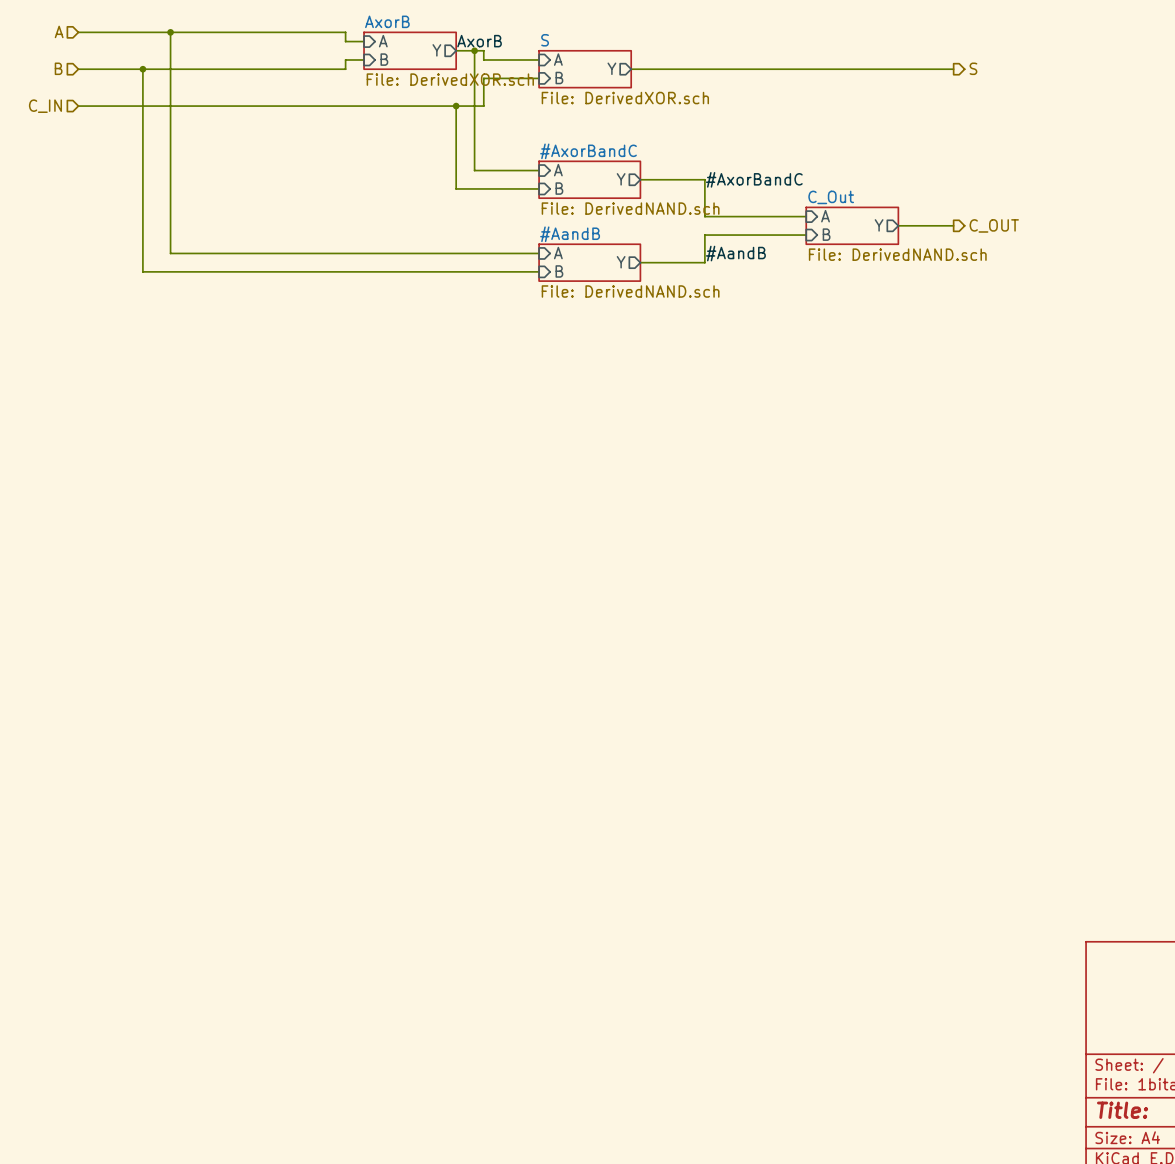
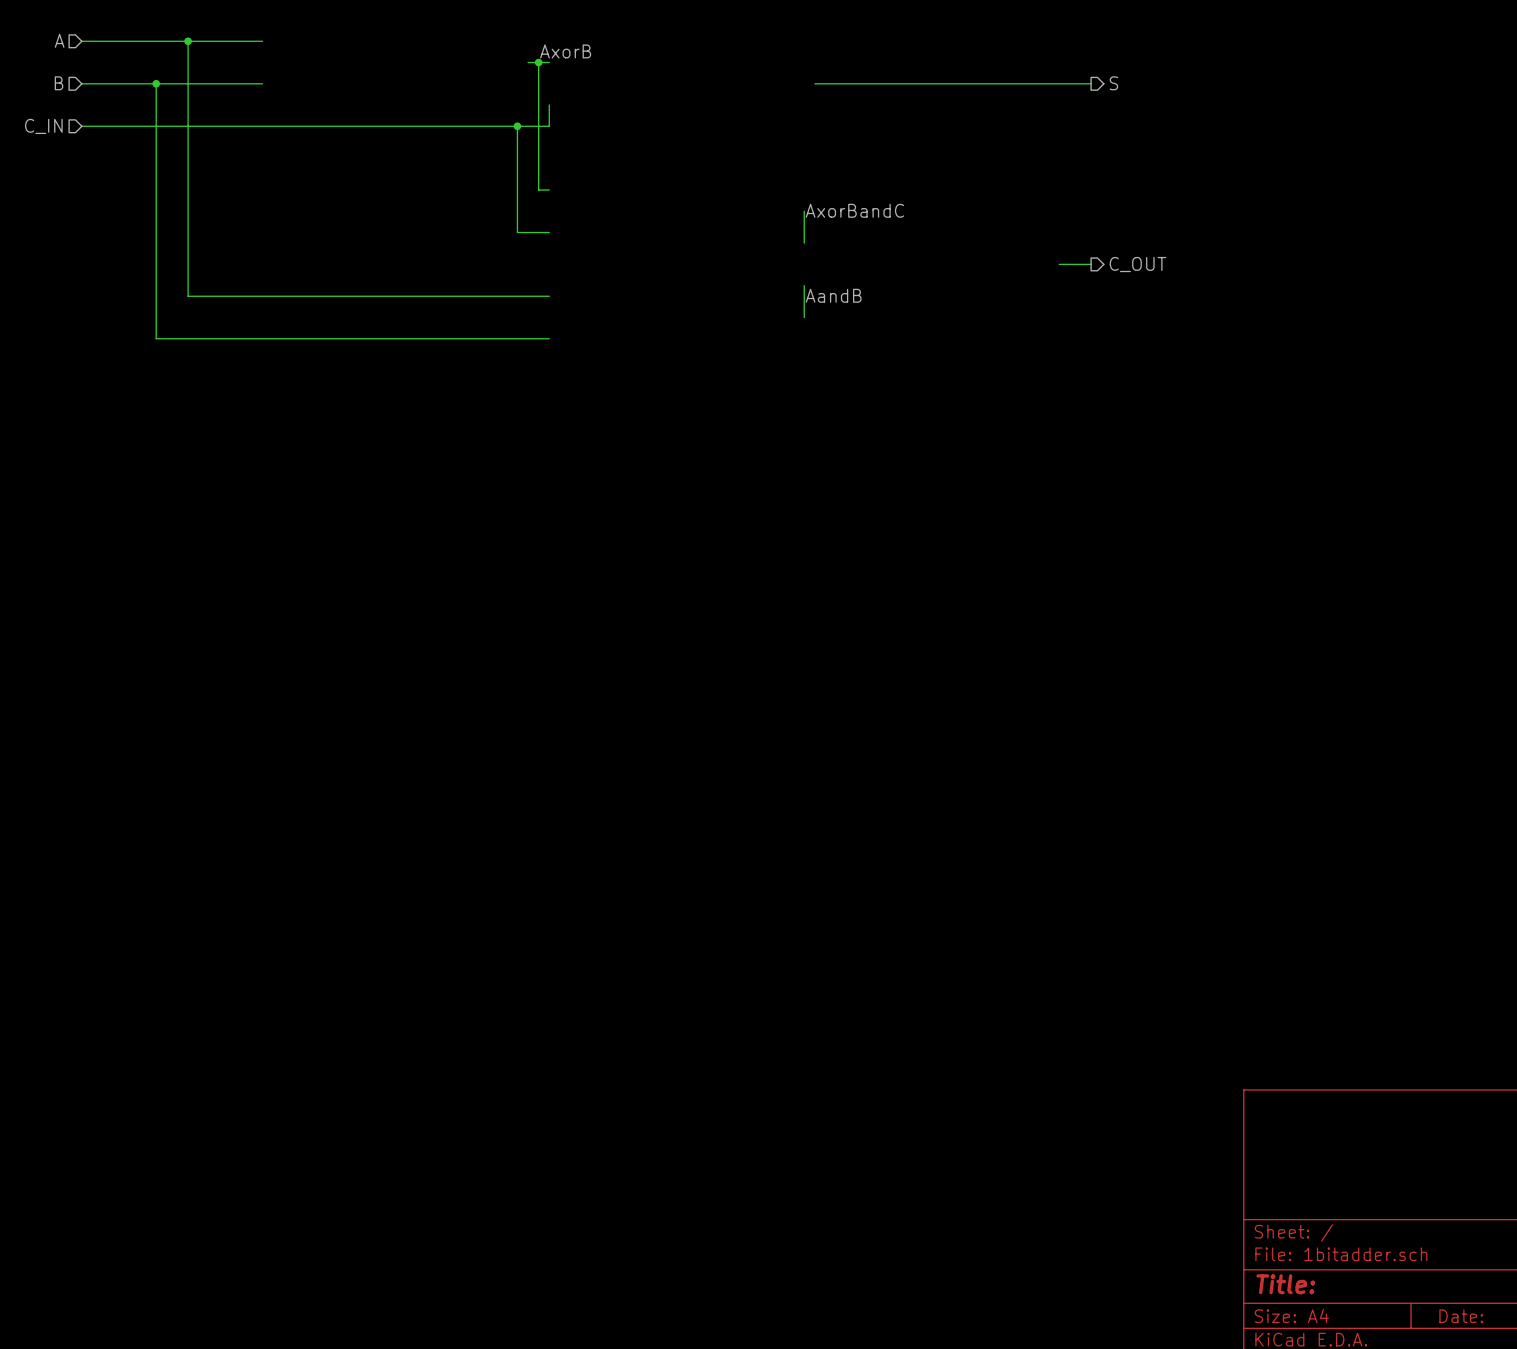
wire: (235, 32) (345, 32) (345, 41) (364, 41) -> none
sheet pin: A (383, 41) -> none
label position: AxorB (479, 41) -> AxorB (565, 51)
sheet AxorB: File: DerivedXOR.sch (410, 50) -> none
sheet pin: Y (436, 50) -> none
wire: (456, 50) (465, 50) -> none
wire: (483, 50) (483, 59) (539, 59) -> none
wire: (364, 59) (345, 59) (345, 69) (235, 69) -> none
sheet pin: B (384, 59) -> none
sheet pin: A (558, 59) -> none
sheet pin: Y (611, 68) -> none
sheet S: File: DerivedXOR.sch (585, 69) -> none
wire: (631, 69) (714, 69) -> none
wire: (539, 78) (483, 78) (483, 87) -> none
sheet pin: B (559, 78) -> none
wire: (474, 161) (474, 170) (539, 170) -> (538, 190) (549, 190)
sheet pin: A (558, 170) -> none
sheet #AxorBandC: File: DerivedNAND.sch (589, 179) -> none
sheet pin: Y (621, 179) -> none
wire: (640, 179) (704, 179) -> none
label: #AxorBandC (754, 179) -> AxorBandC (854, 210)
wire: (456, 188) (539, 188) -> (517, 221) (517, 232) (549, 232)
sheet pin: B (559, 188) -> none
wire: (704, 207) (704, 216) (806, 216) -> none
sheet pin: A (825, 216) -> none
sheet C_Out: File: DerivedNAND.sch (852, 225) -> none
sheet pin: Y (879, 225) -> none
wire: (898, 225) (926, 225) -> none
sheet pin: B (826, 234) -> none
wire: (806, 235) (704, 235) (704, 244) -> none
wire: (483, 253) (539, 253) -> none
sheet pin: A (558, 253) -> none
label: #AandB (735, 253) -> AandB (833, 295)
sheet #AandB: File: DerivedNAND.sch (589, 262) -> none
sheet pin: Y (621, 262) -> none
wire: (640, 262) (704, 262) -> (804, 317) (804, 306)
wire: (142, 271) (539, 271) -> (156, 317) (156, 338) (549, 338)
sheet pin: B (559, 271) -> none

